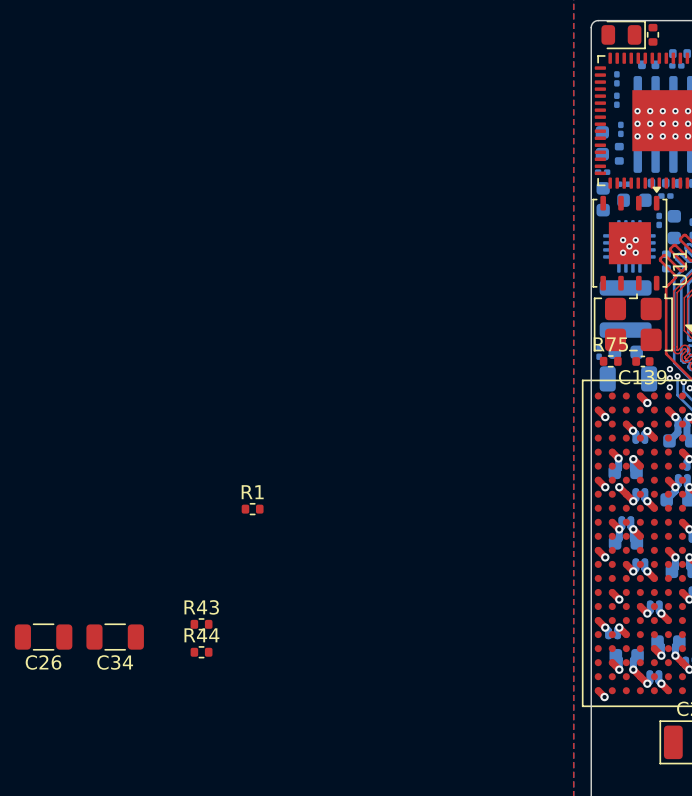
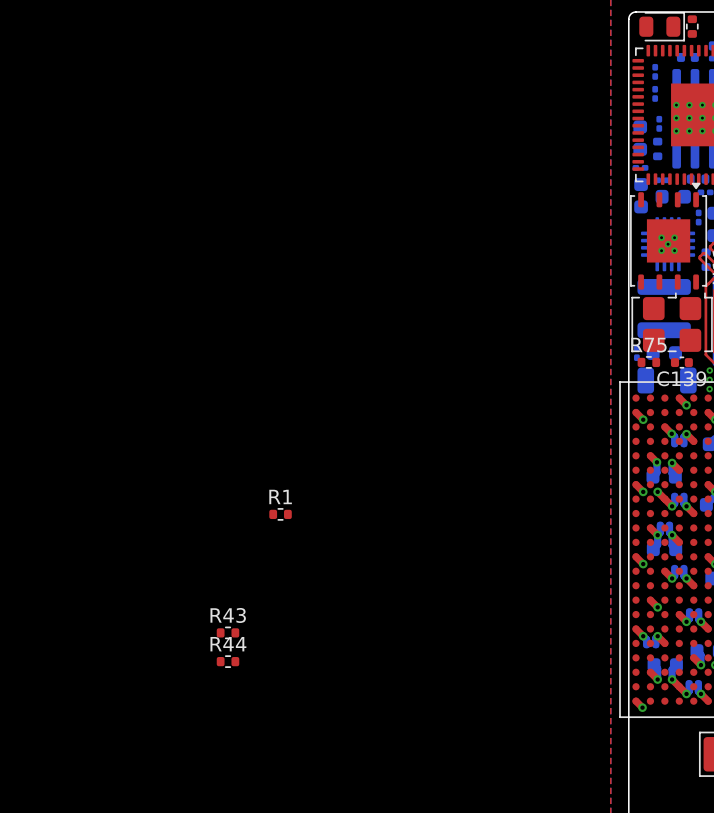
C26: (43, 637) -> none
C34: (115, 637) -> none

